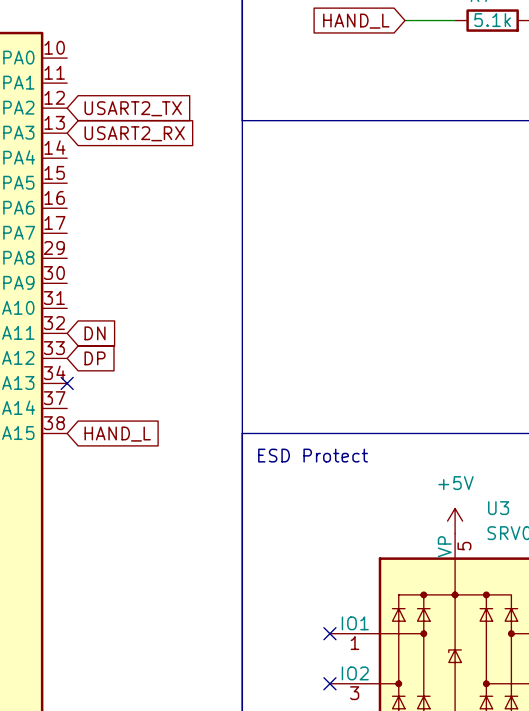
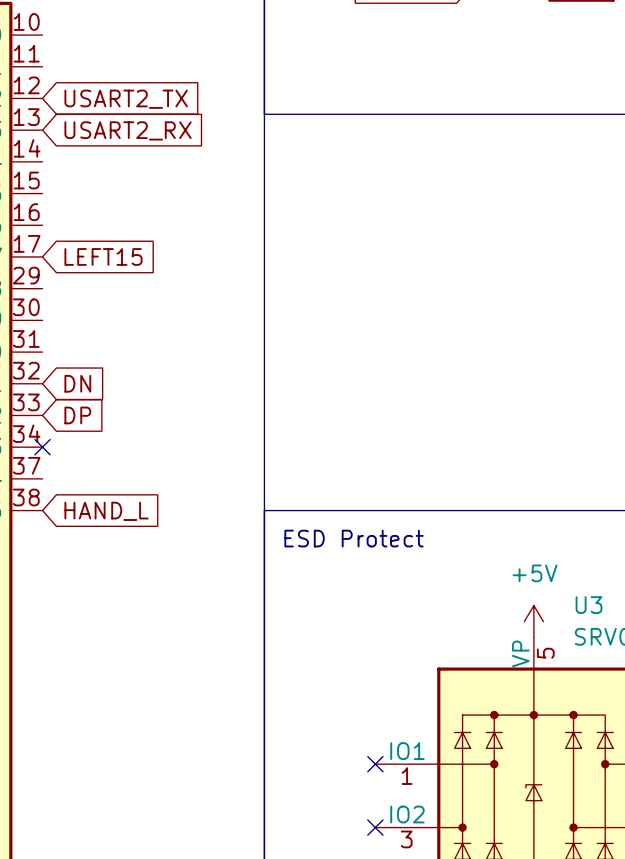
global label: none -> LEFT15 (103, 256)

